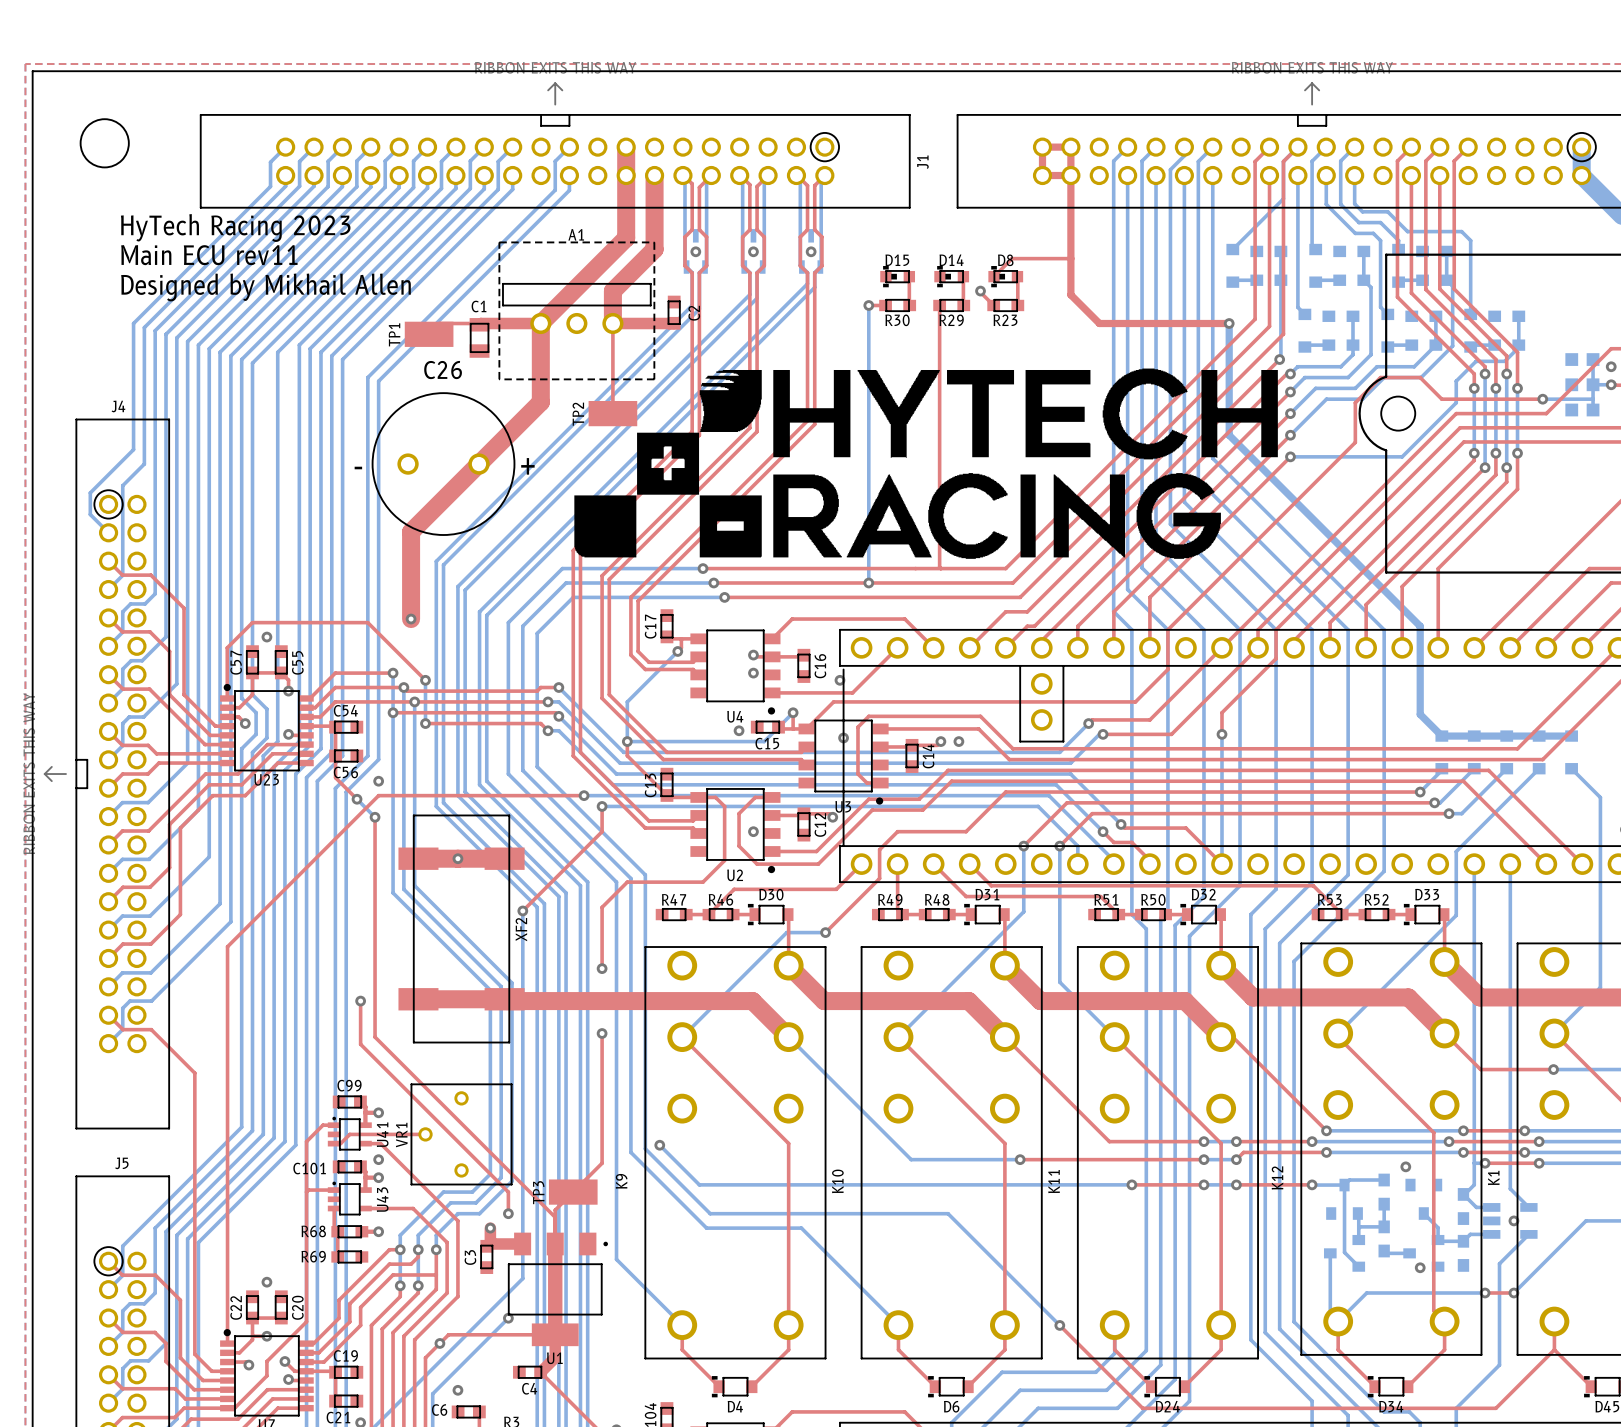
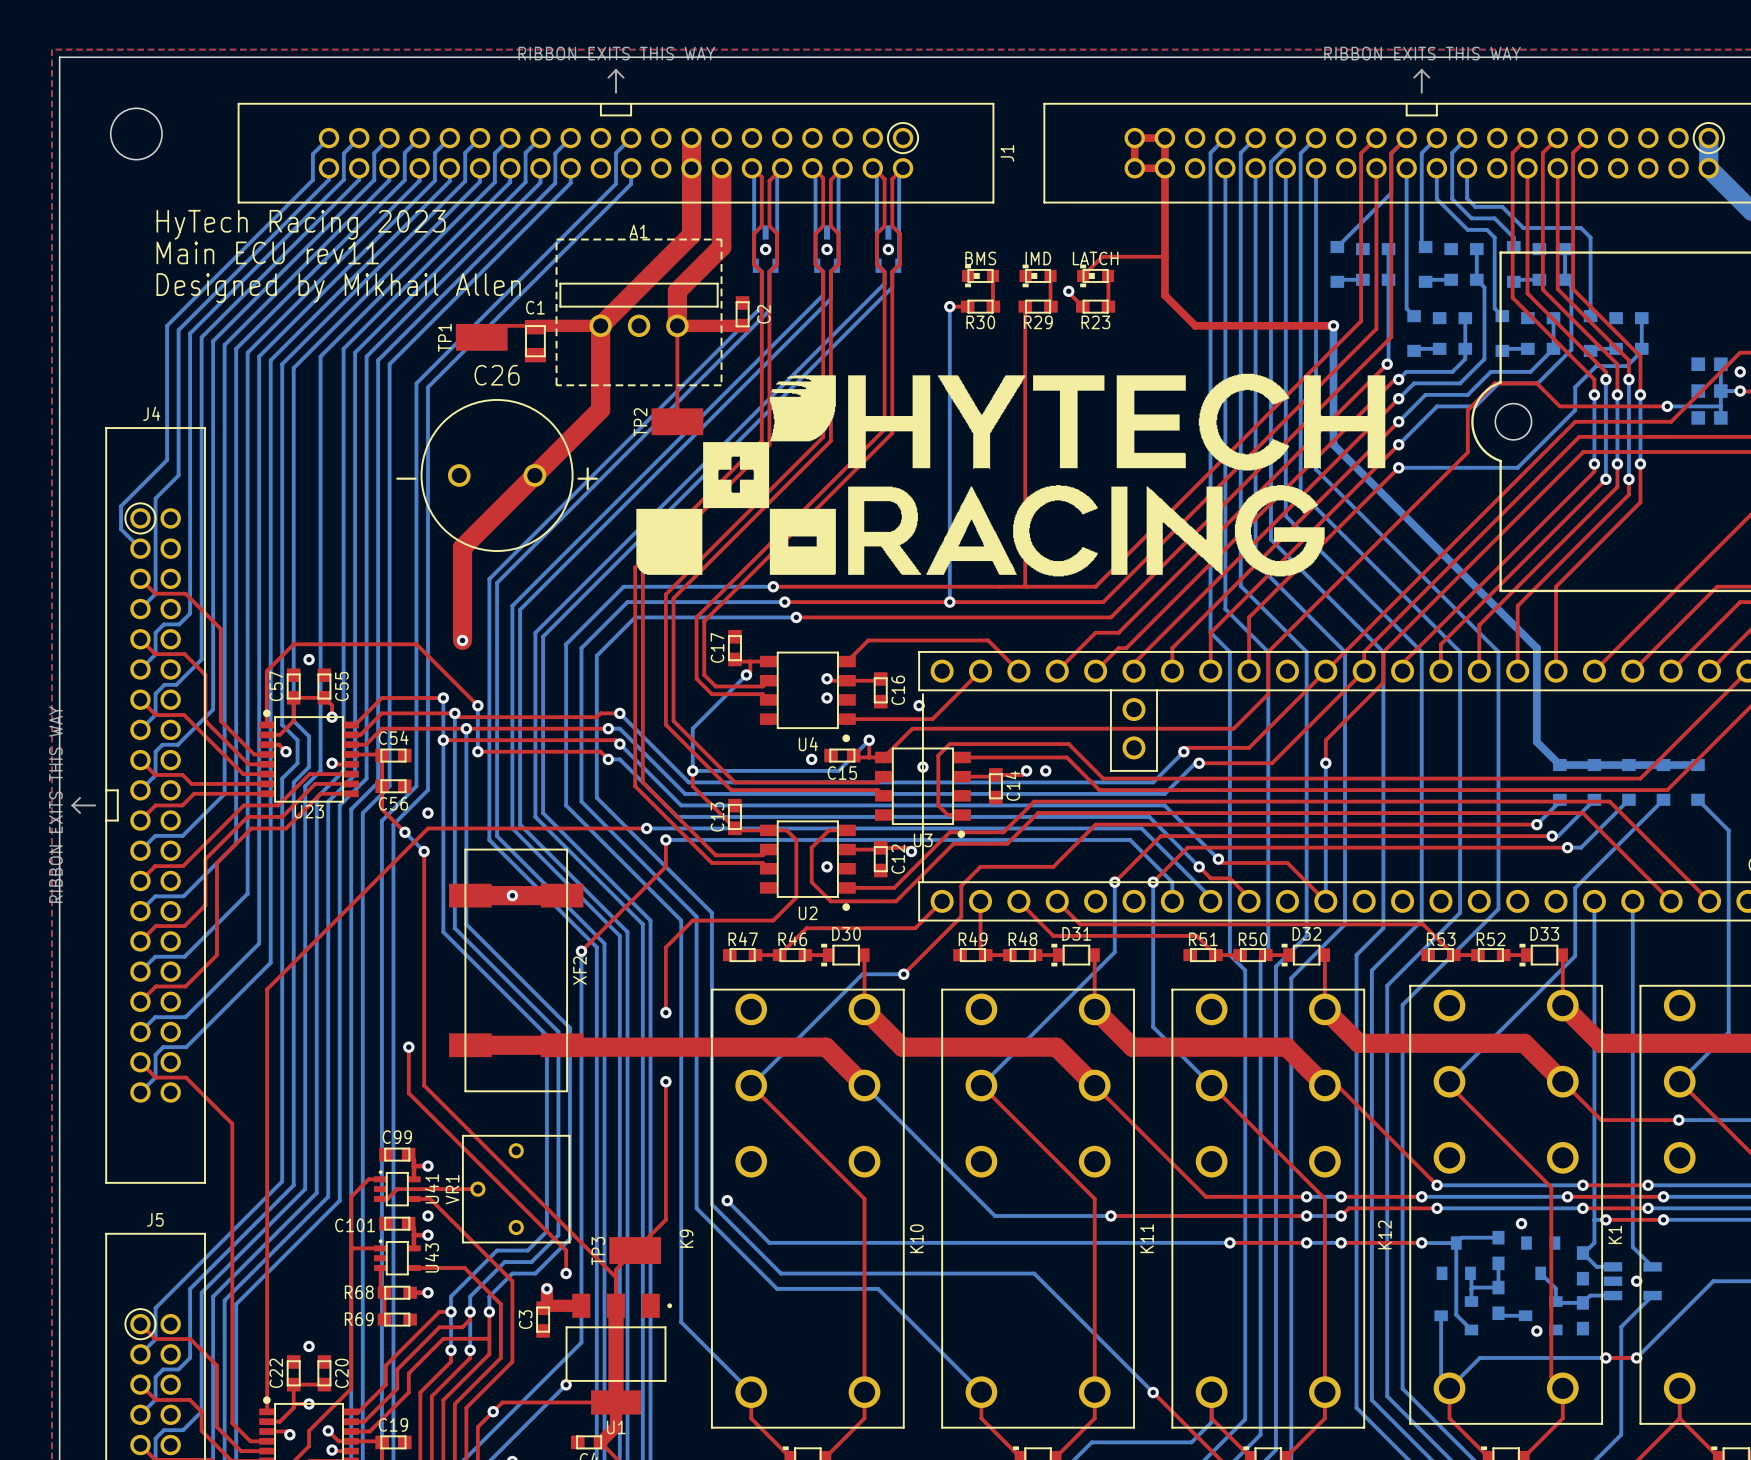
D15 name: D15 (897, 260) -> BMS (980, 258)
D14 name: D14 (951, 260) -> IMD (1038, 258)
D8 name: D8 (1005, 260) -> LATCH (1095, 258)

